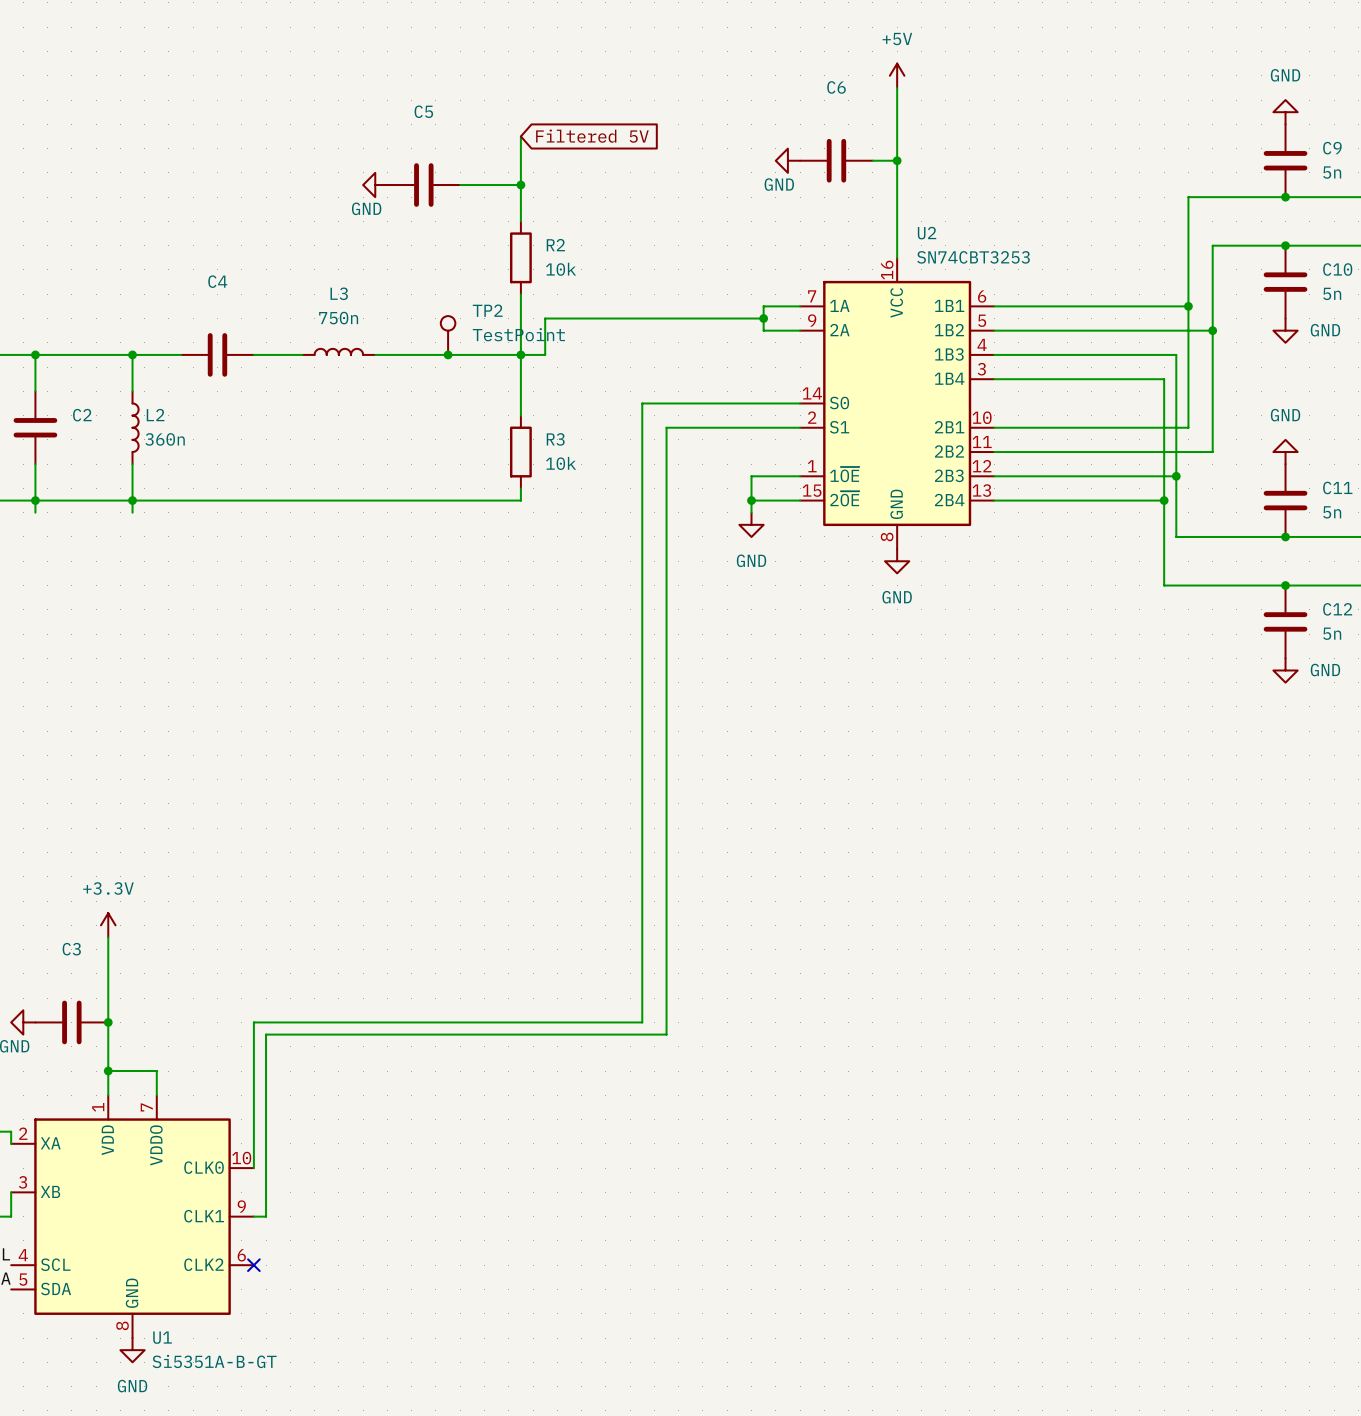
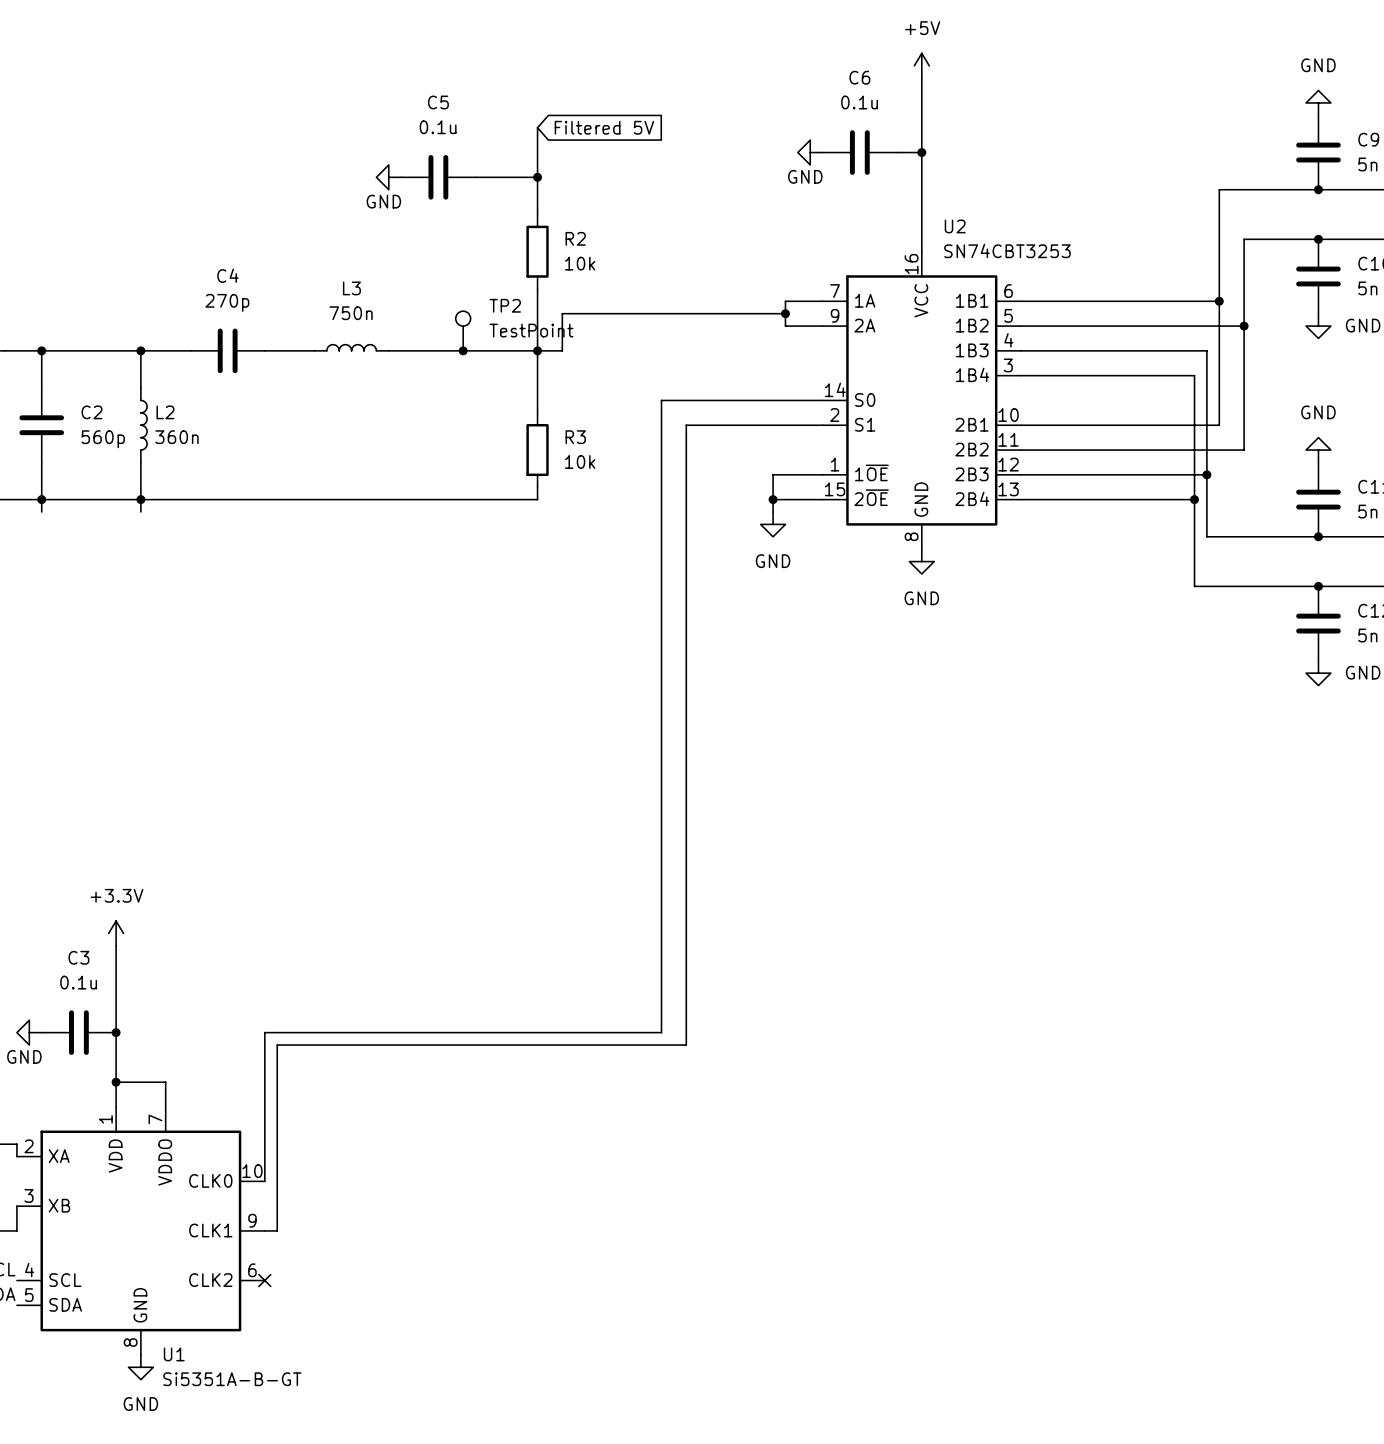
C6 value: none -> 0.1u (859, 102)
C5 value: none -> 0.1u (438, 127)
C4 value: none -> 270p (227, 302)
C2 value: none -> 560p (103, 439)
C3 value: none -> 0.1u (78, 982)

